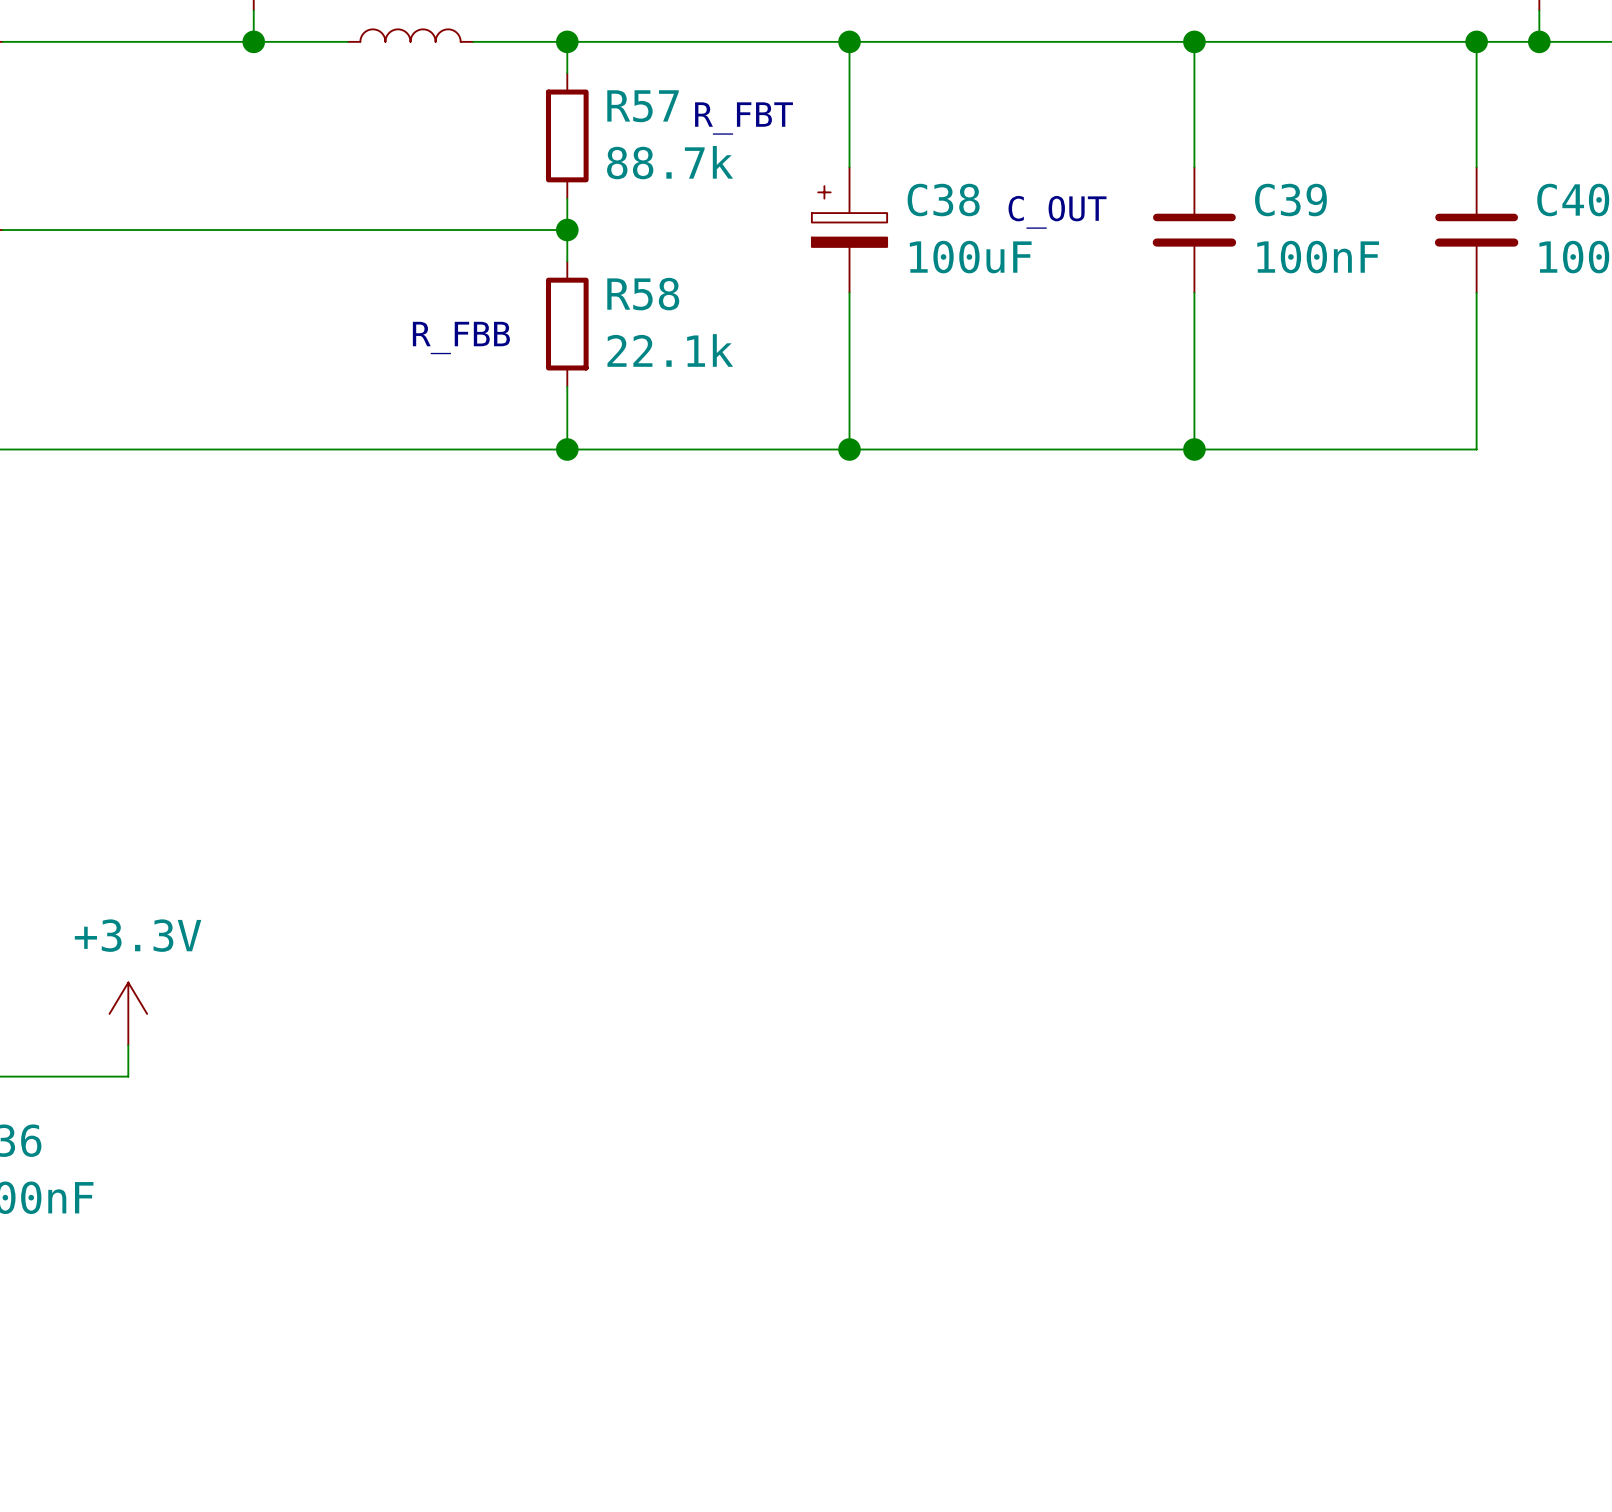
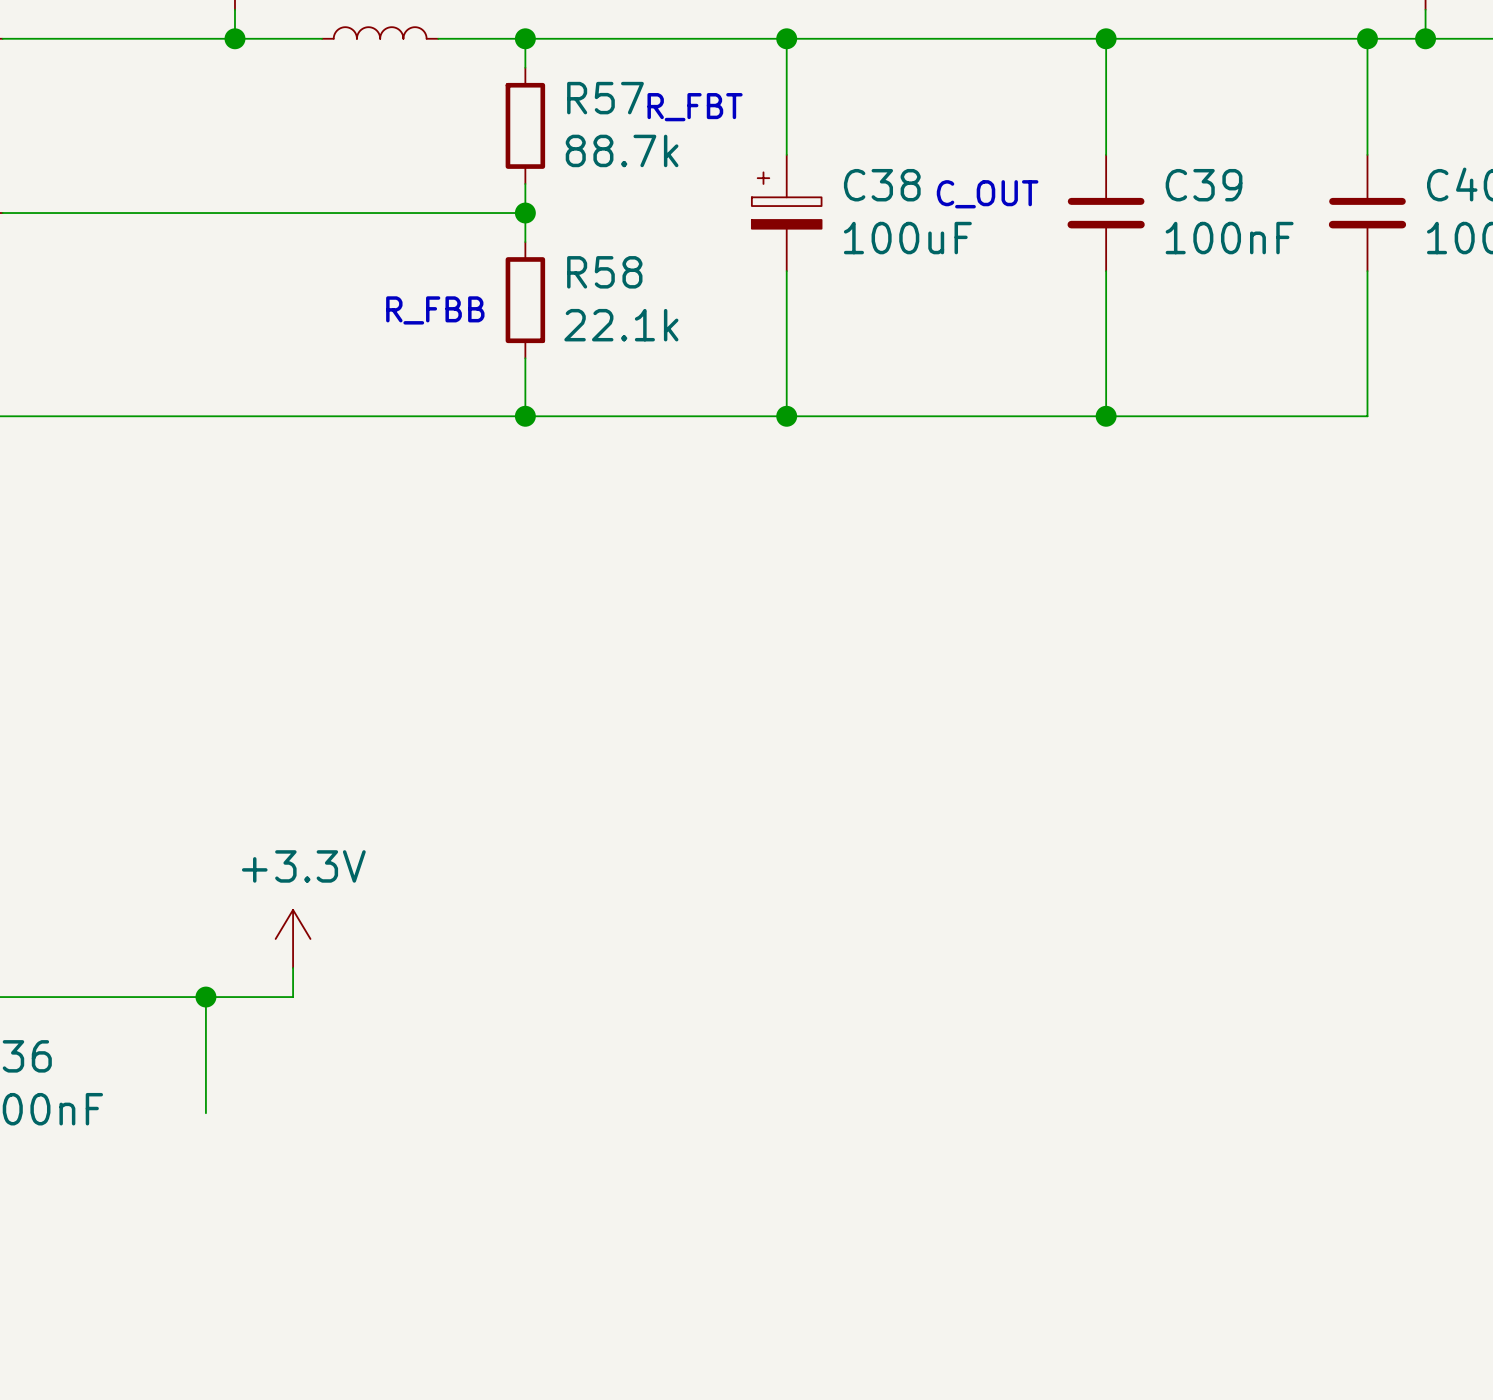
power symbol position: +3.3V (128, 1013) -> +3.3V (293, 938)
wire: (128, 1045) (128, 1076) -> (293, 968) (293, 997) (118, 997)
wire: none -> (205, 997) (205, 1113)
junction: none -> (205, 997)

